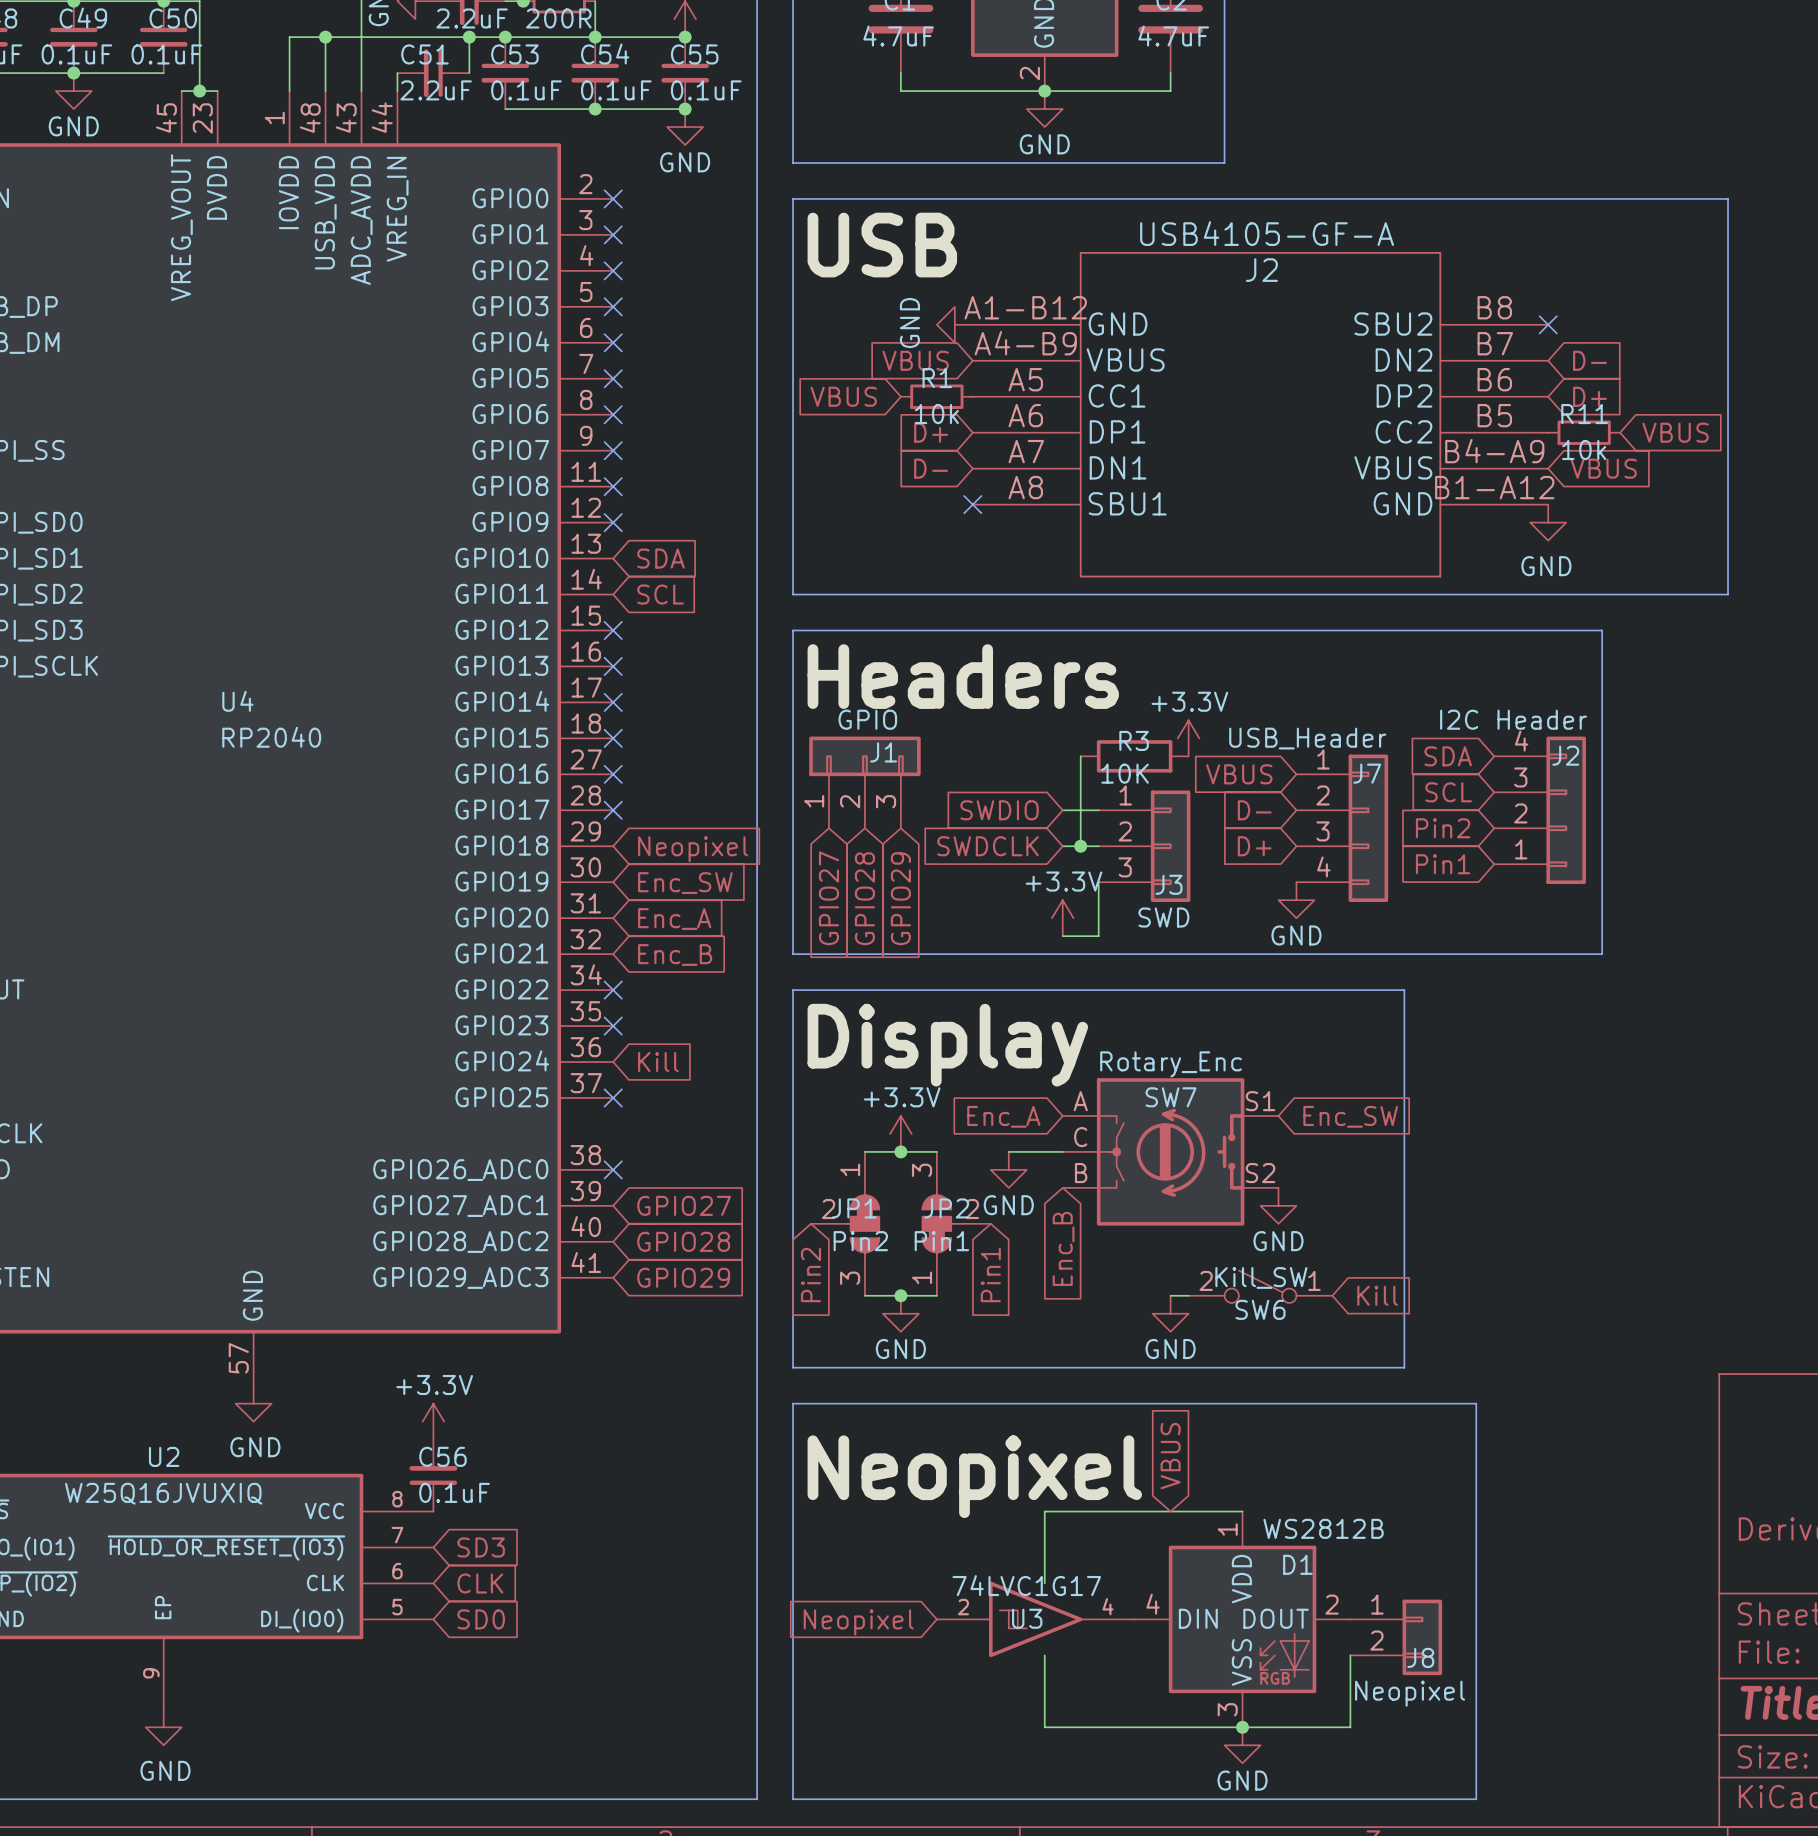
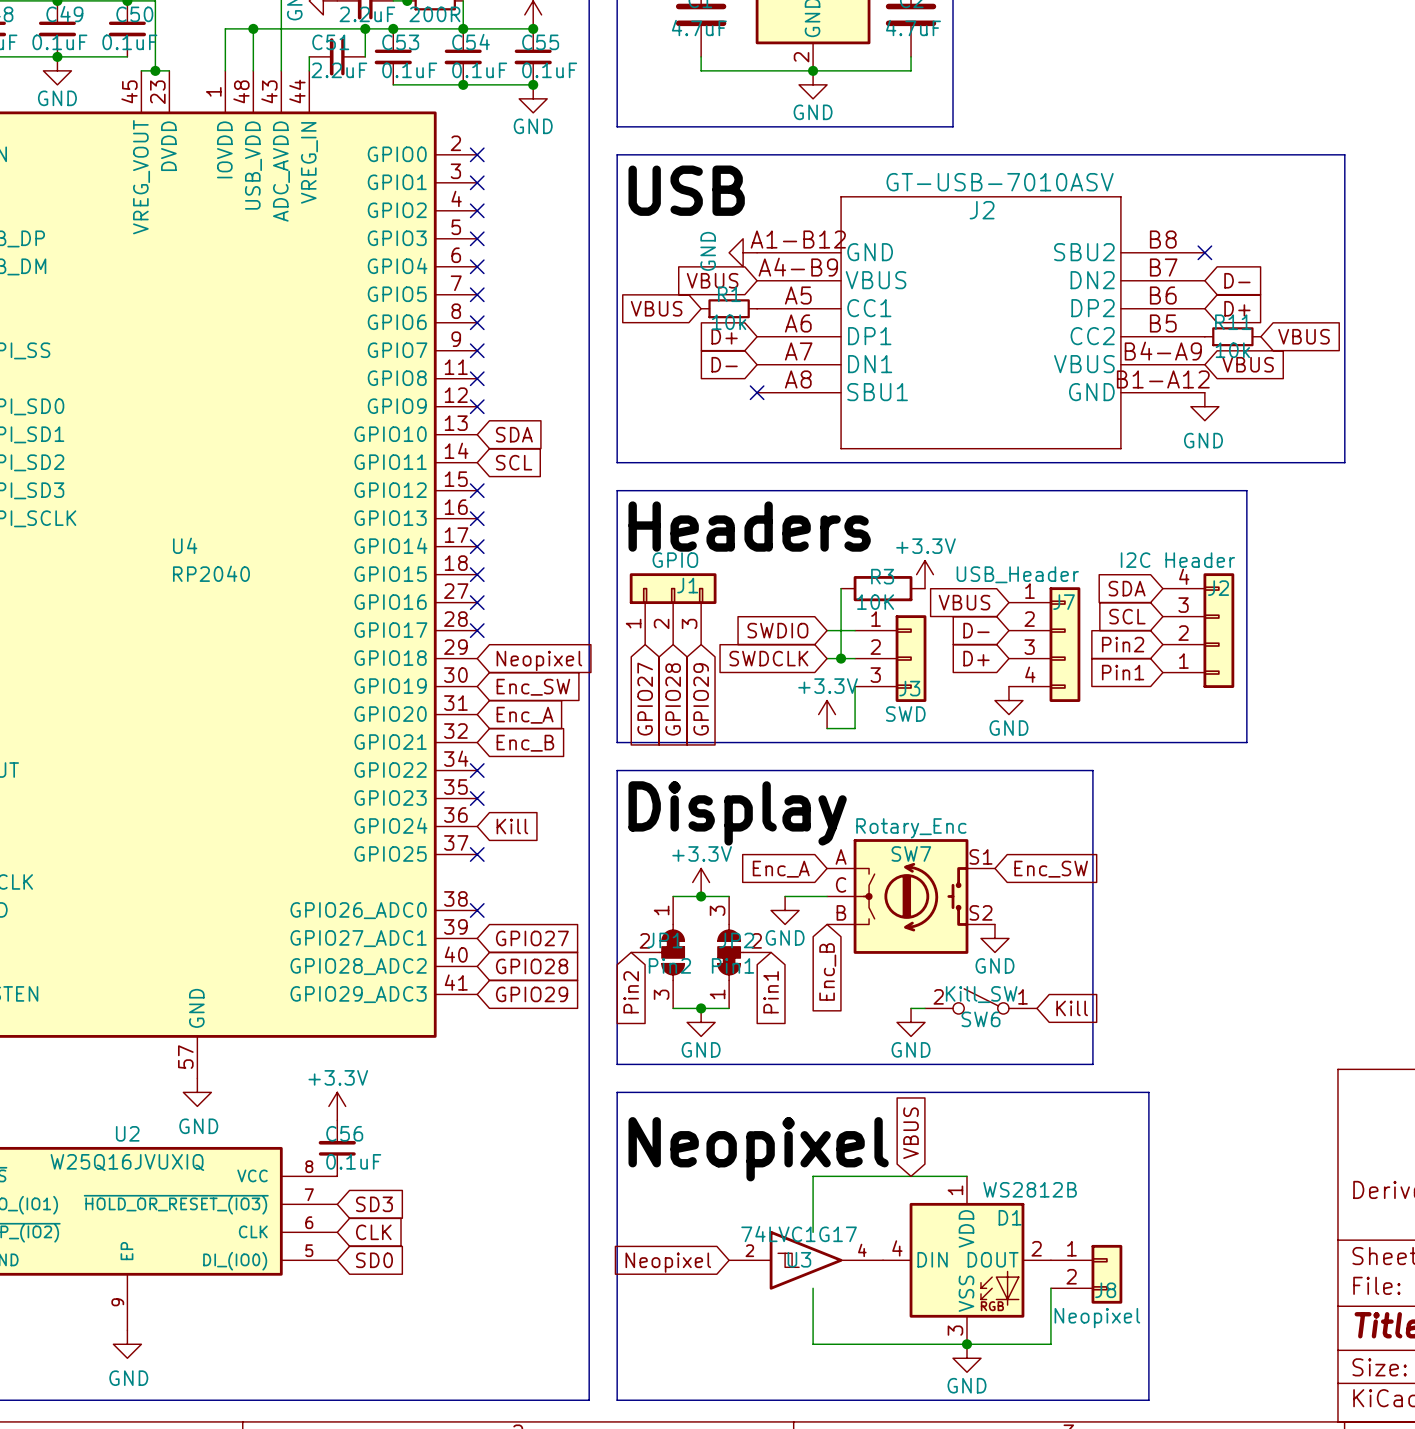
J2 value: USB4105-GF-A (1267, 233) -> GT-USB-7010ASV (1000, 182)

